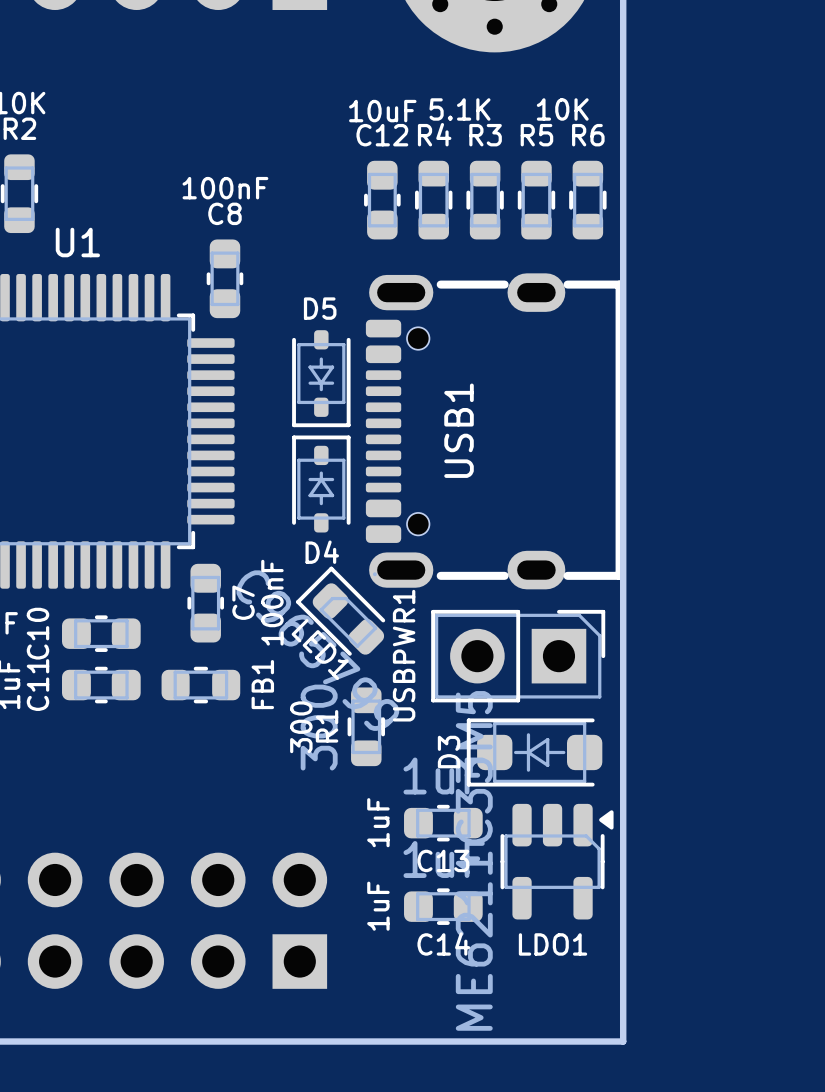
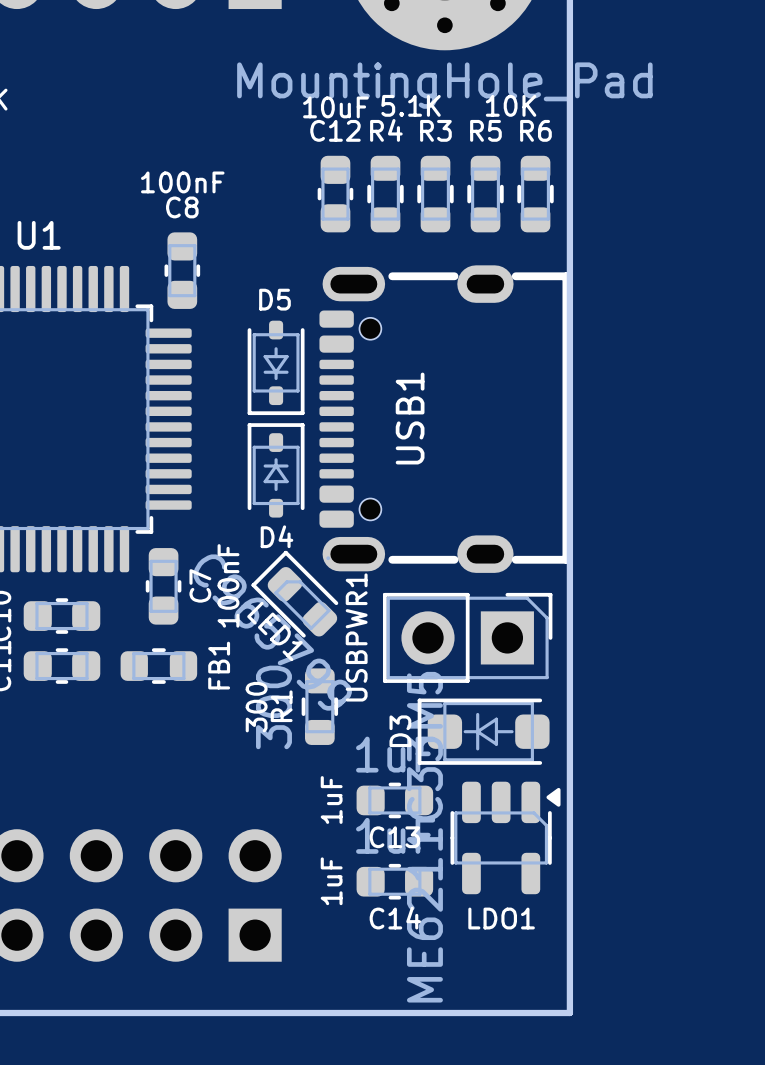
part value: none -> MountingHole_Pad (444, 85)

